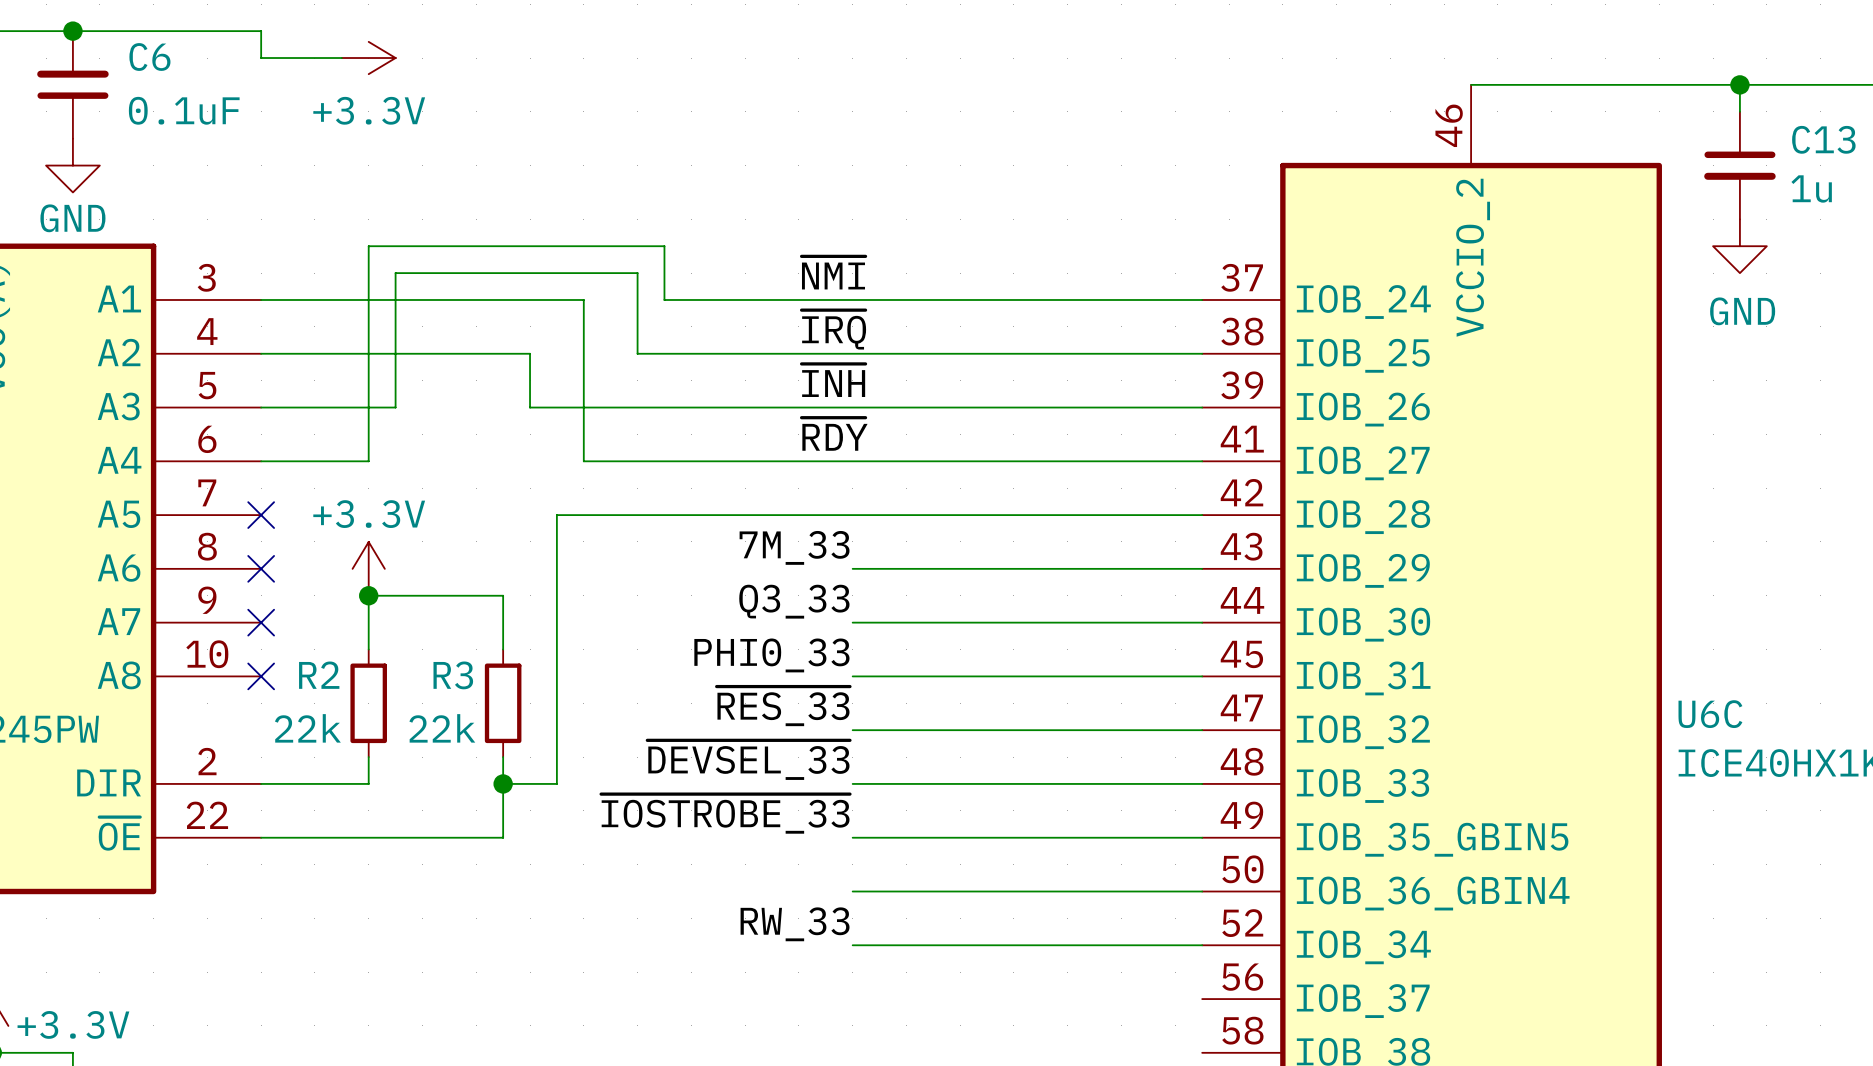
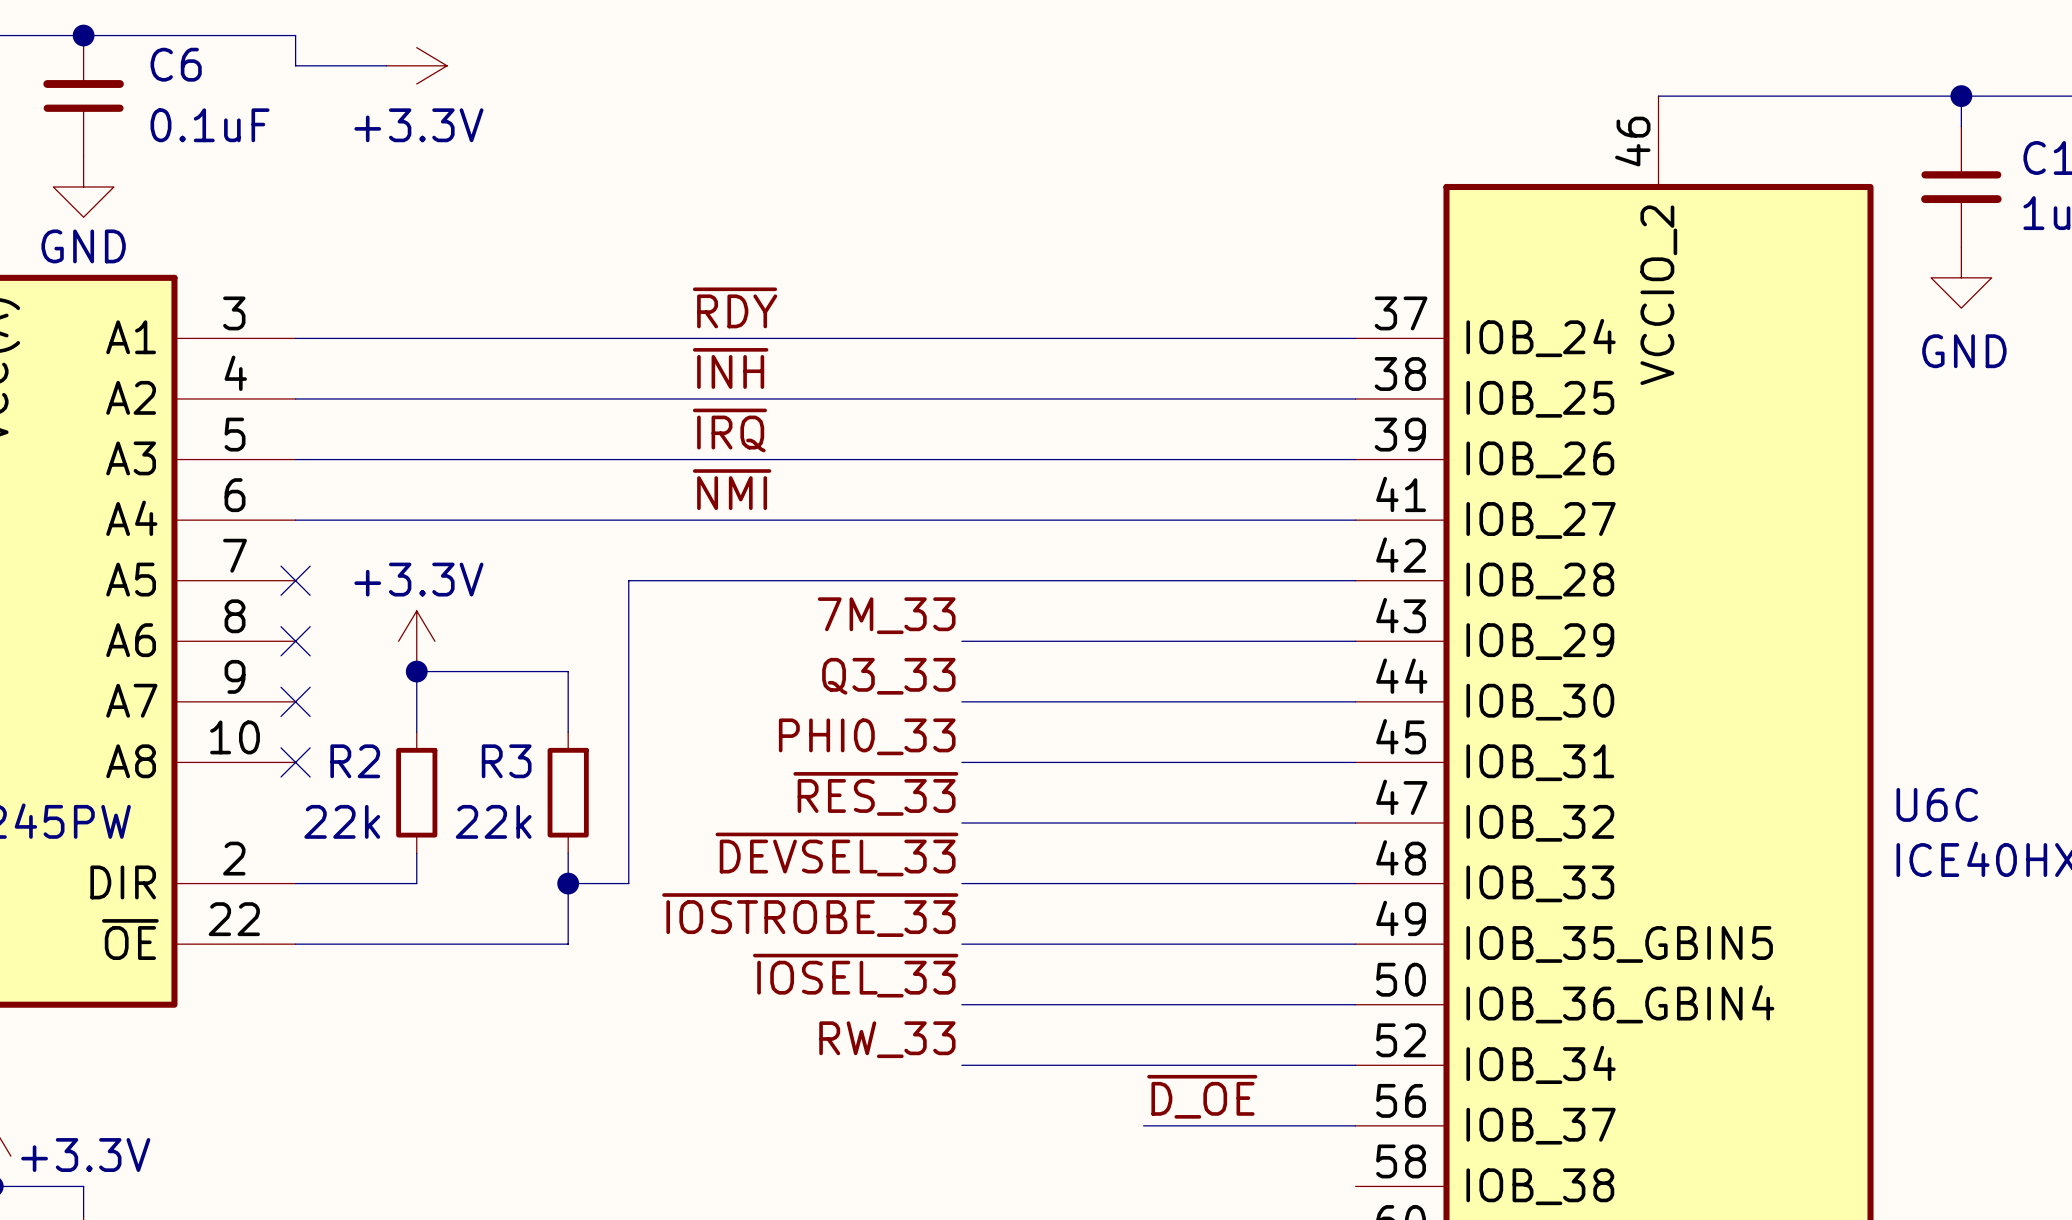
label position: ~{NMI} (833, 272) -> ~{NMI} (732, 489)
wire: (583, 299) (583, 461) -> (659, 338) (749, 338)
wire: (664, 299) (664, 246) (368, 246) (368, 461) -> (659, 520) (416, 520)
label position: ~{IRQ} (833, 329) -> ~{IRQ} (729, 430)
wire: (530, 353) (530, 407) -> (598, 398) (719, 398)
wire: (637, 353) (637, 273) (395, 273) (395, 407) -> (598, 459) (447, 459)
label position: ~{INH} (833, 380) -> ~{INH} (730, 368)
label position: ~{RDY} (834, 434) -> ~{RDY} (735, 307)
label: none -> ~{IOSEL_33} (855, 975)
label: none -> ~{D_OE} (1202, 1096)
wire: none -> (1143, 1125) (1355, 1125)

